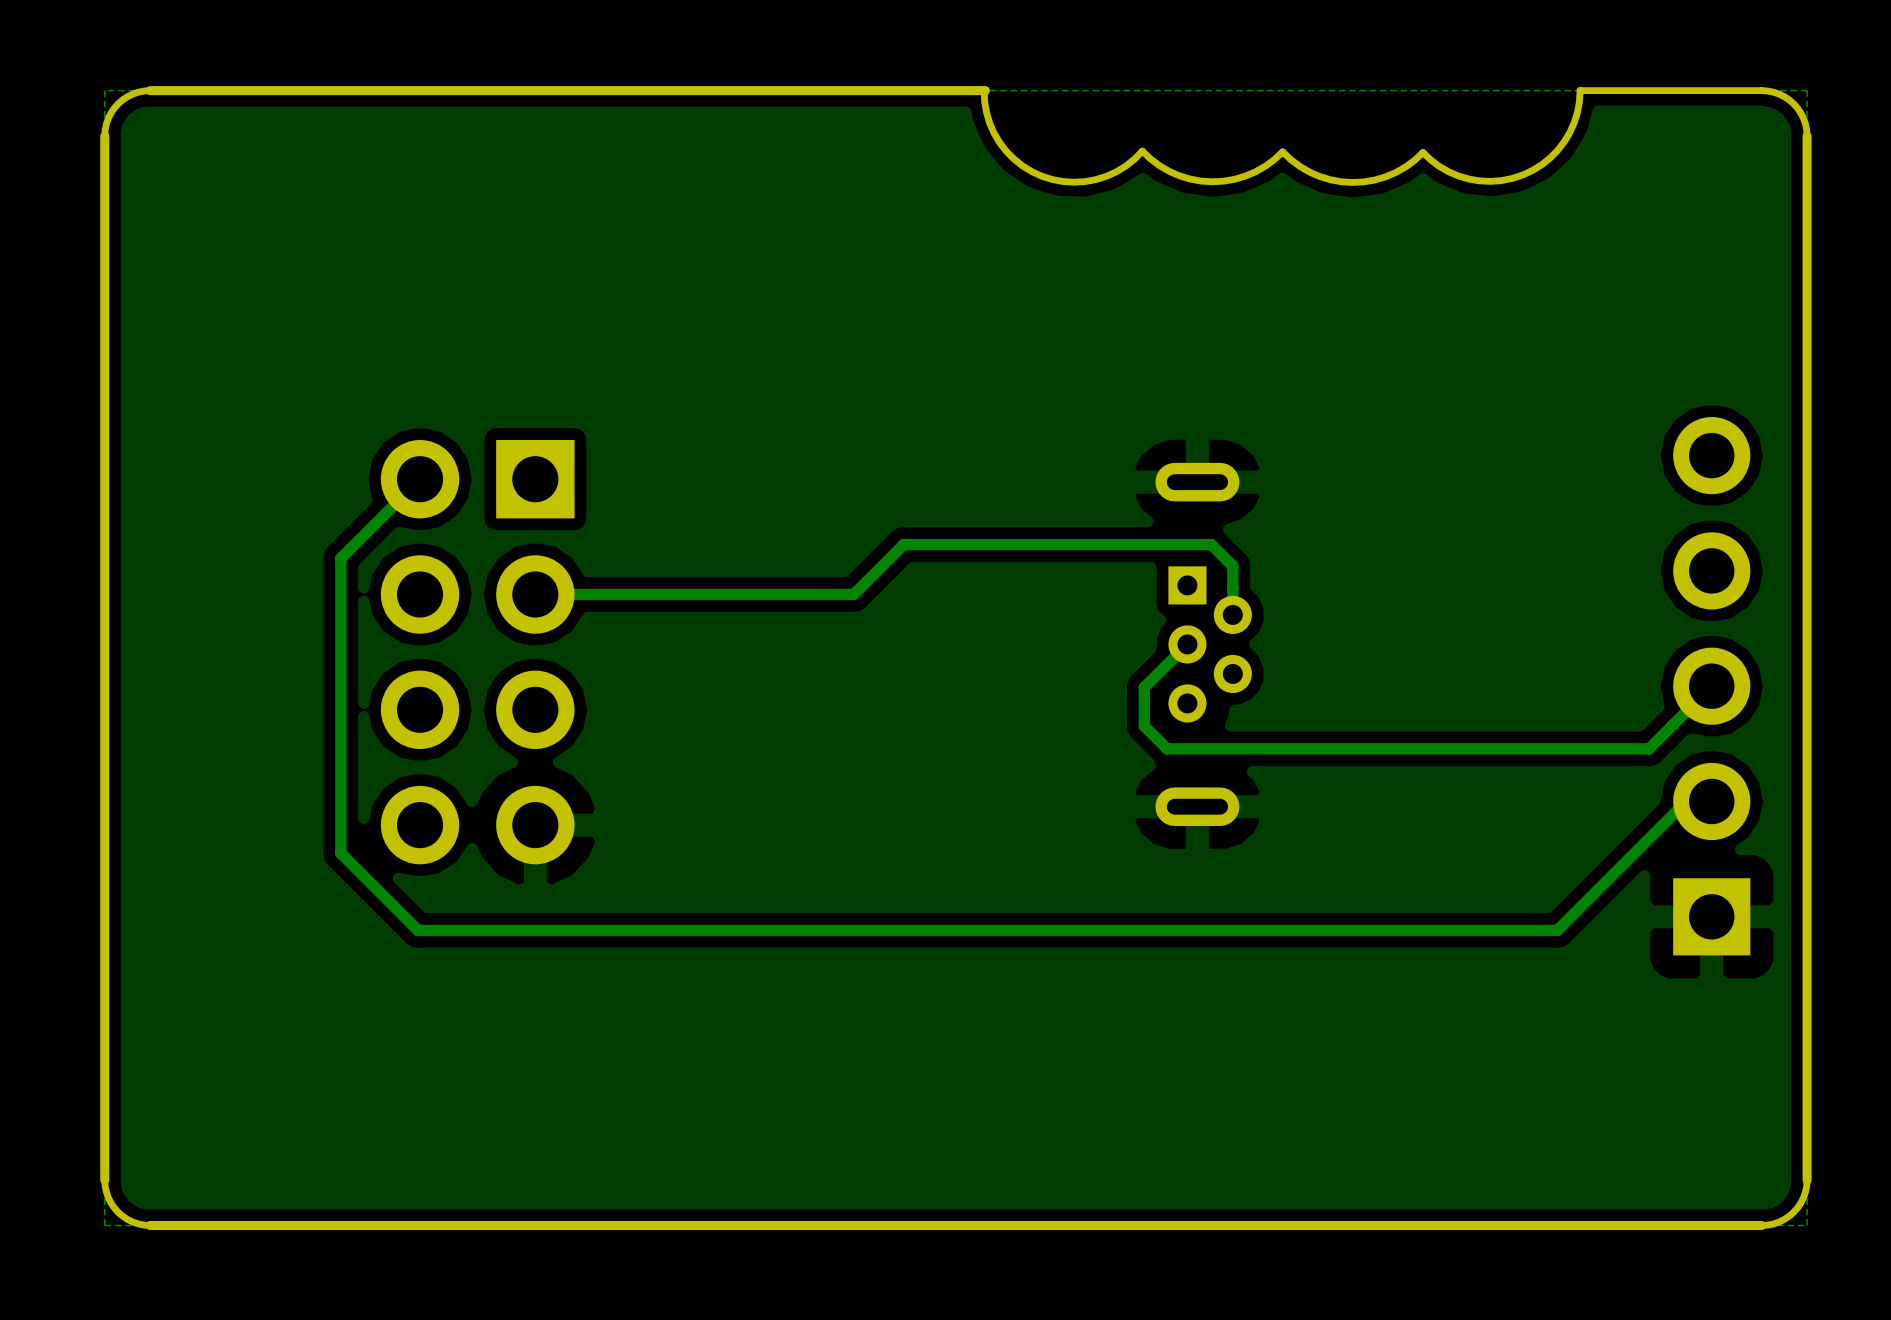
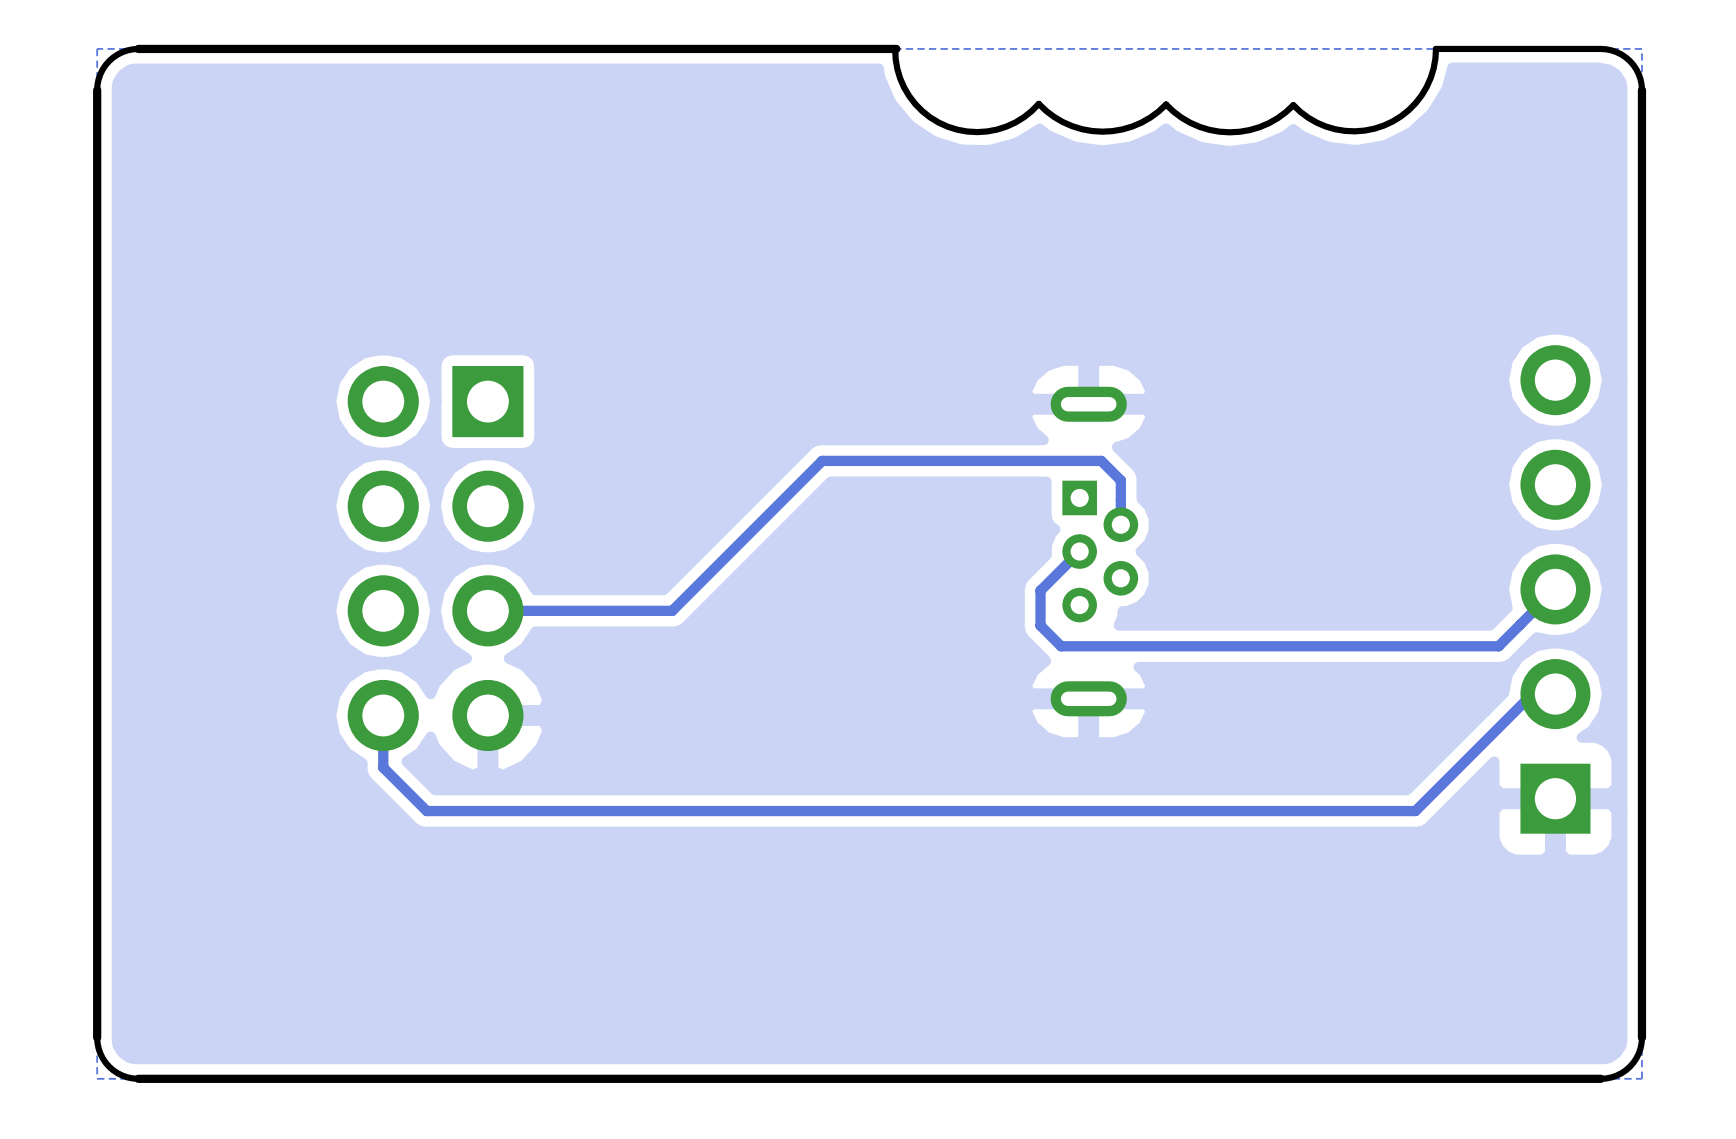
track: (420, 479) (340, 558) (340, 853) (418, 930) (467, 930) -> (383, 715) (383, 767) (426, 811)
track: (853, 594) (535, 594) -> (776, 506) (672, 610) (487, 610)

